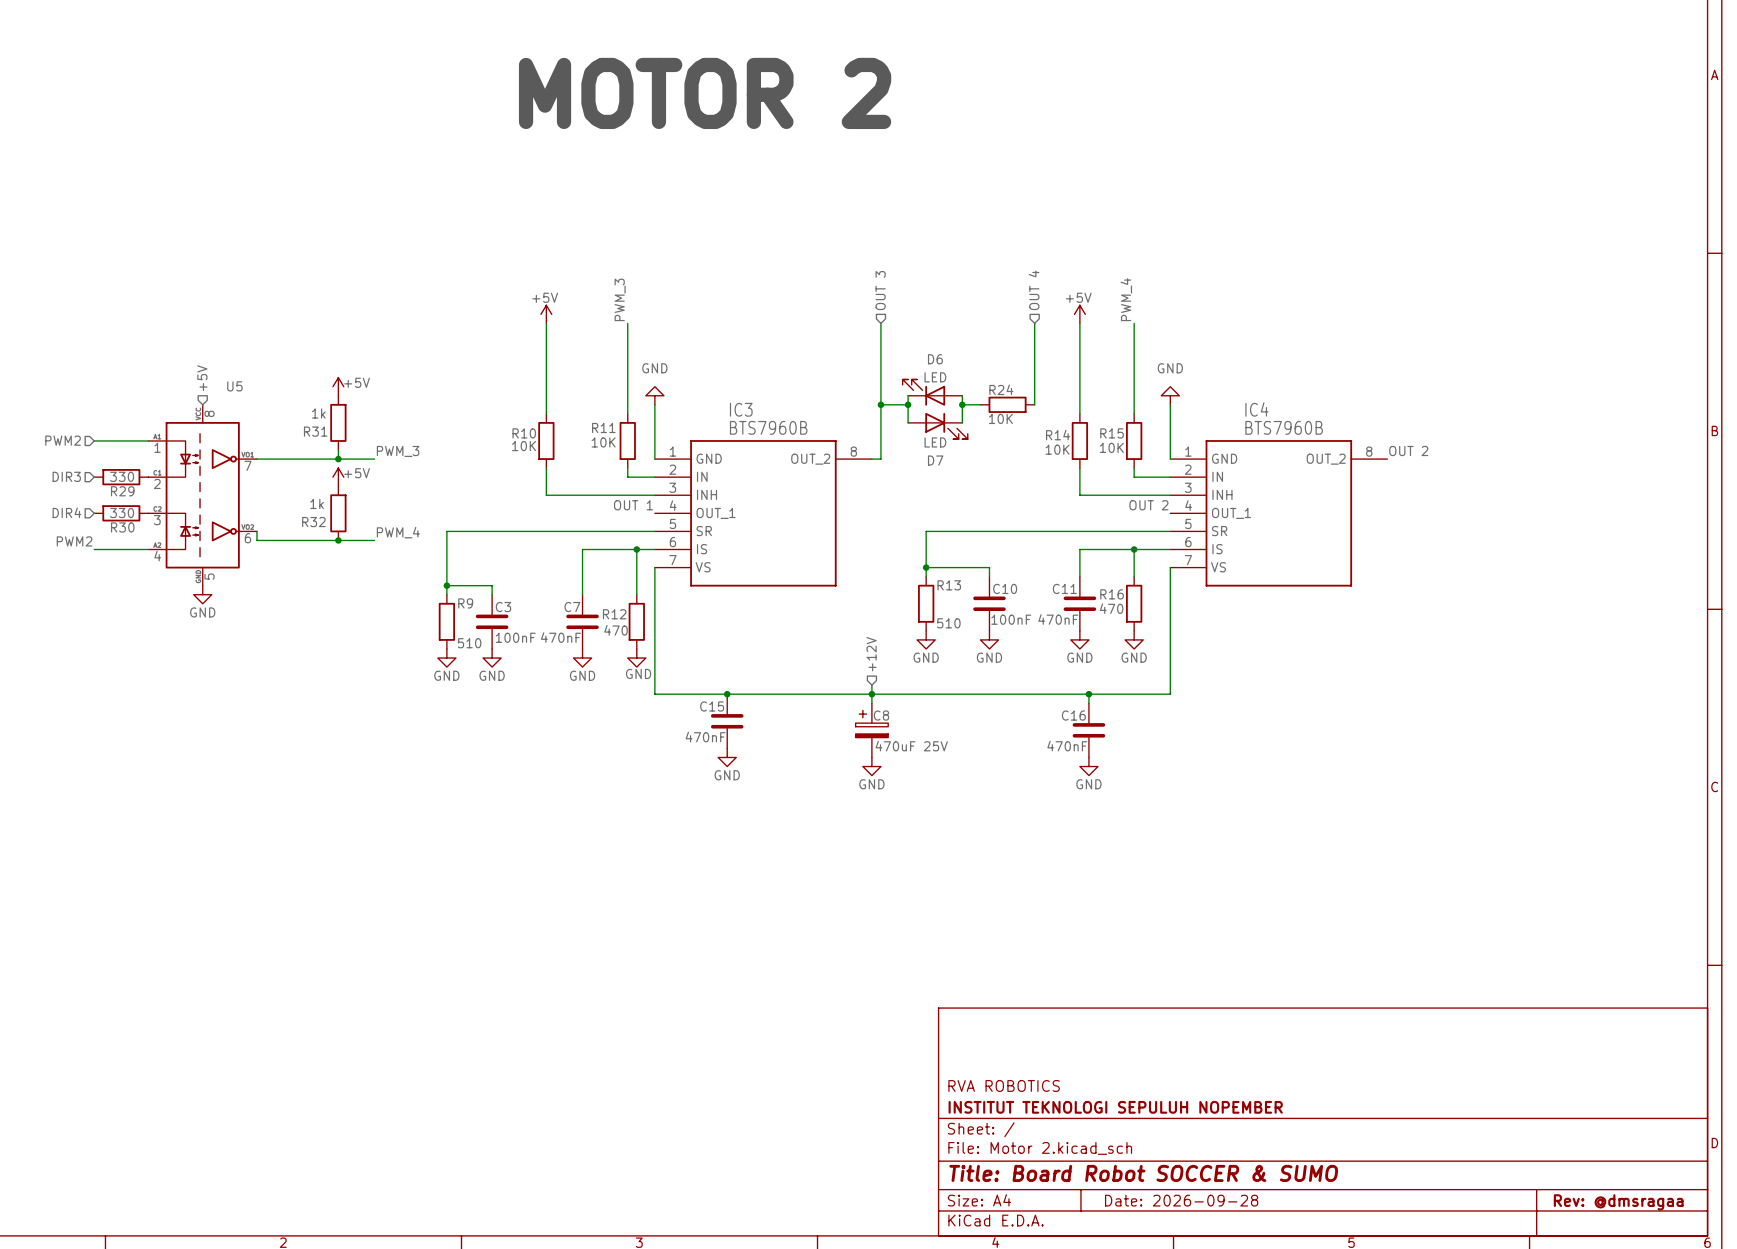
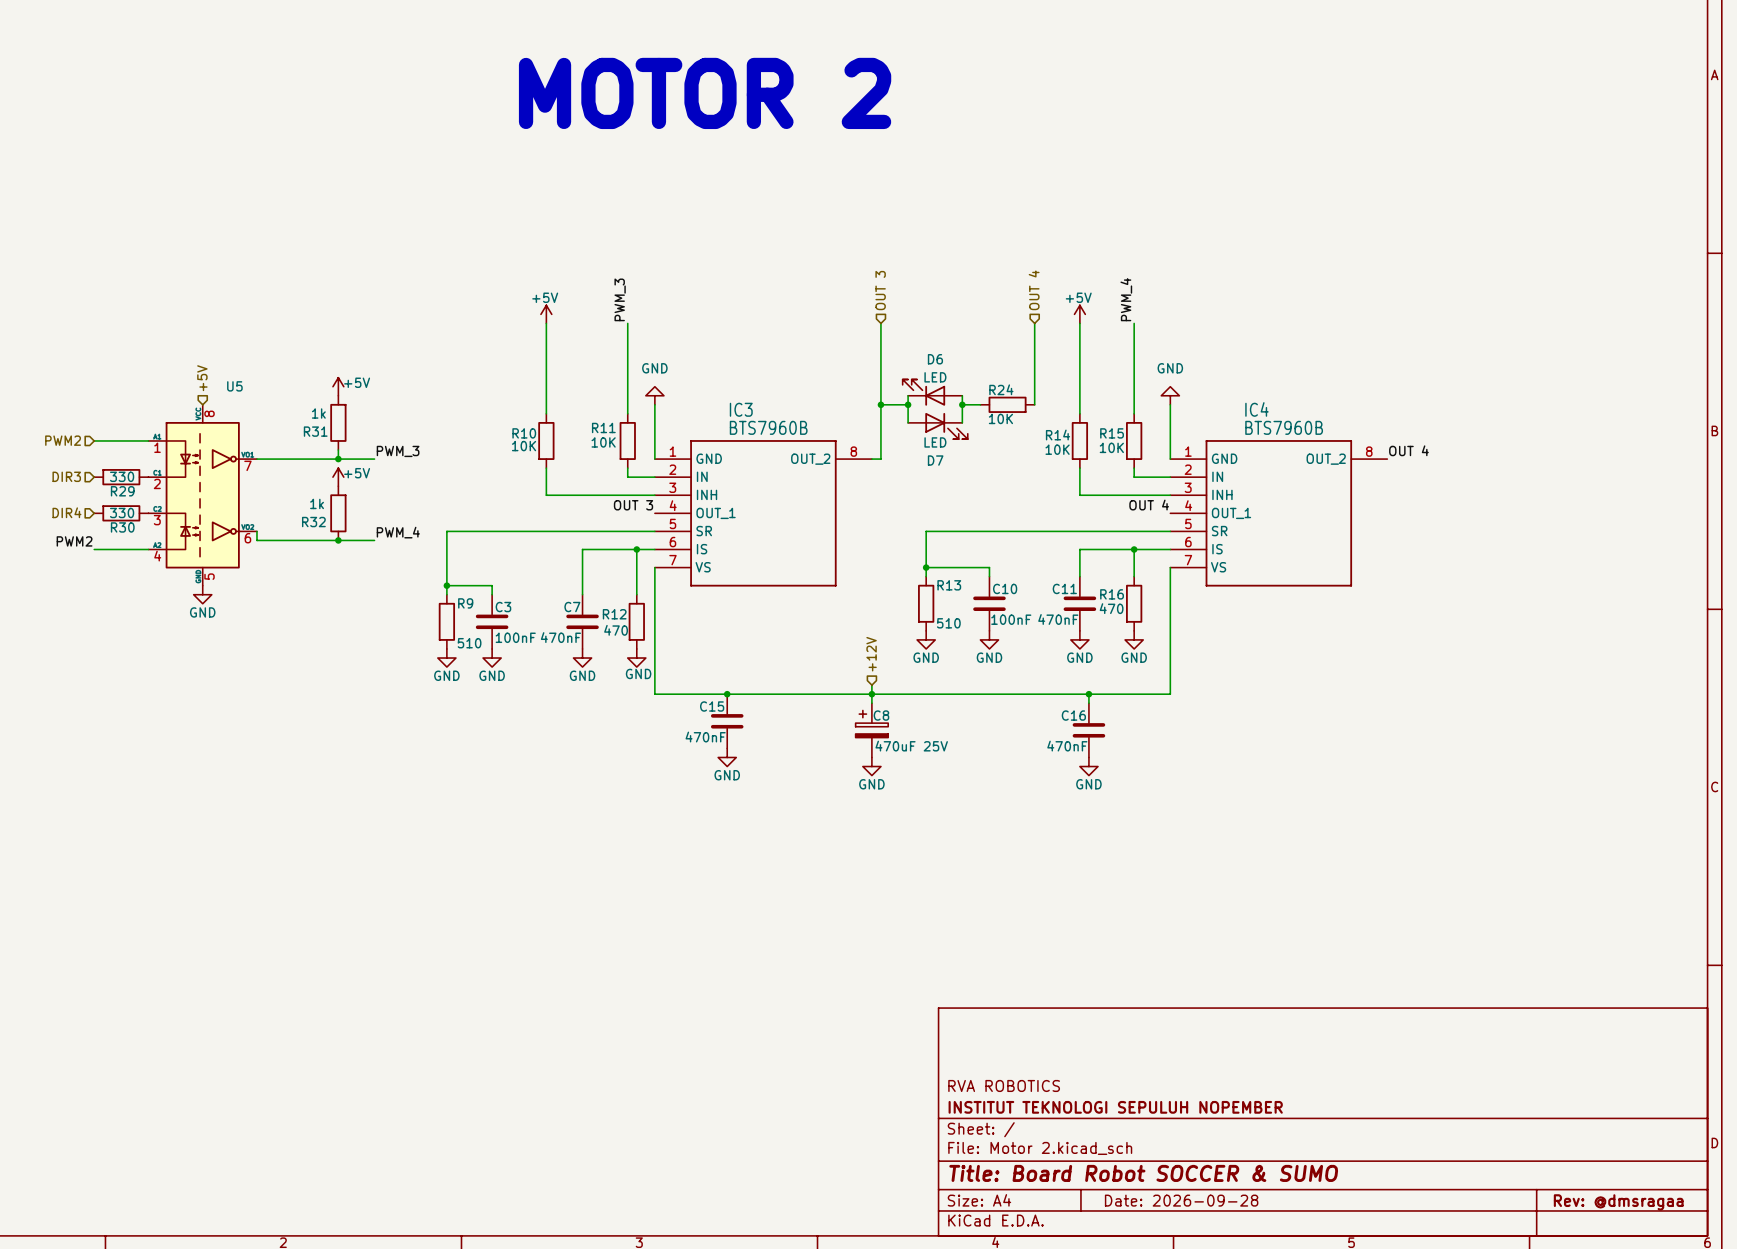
label: OUT 2 (1408, 451) -> OUT 4 (1408, 450)
label: OUT 1 (633, 505) -> OUT 3 (633, 505)
label: OUT 2 (1148, 505) -> OUT 4 (1149, 505)

